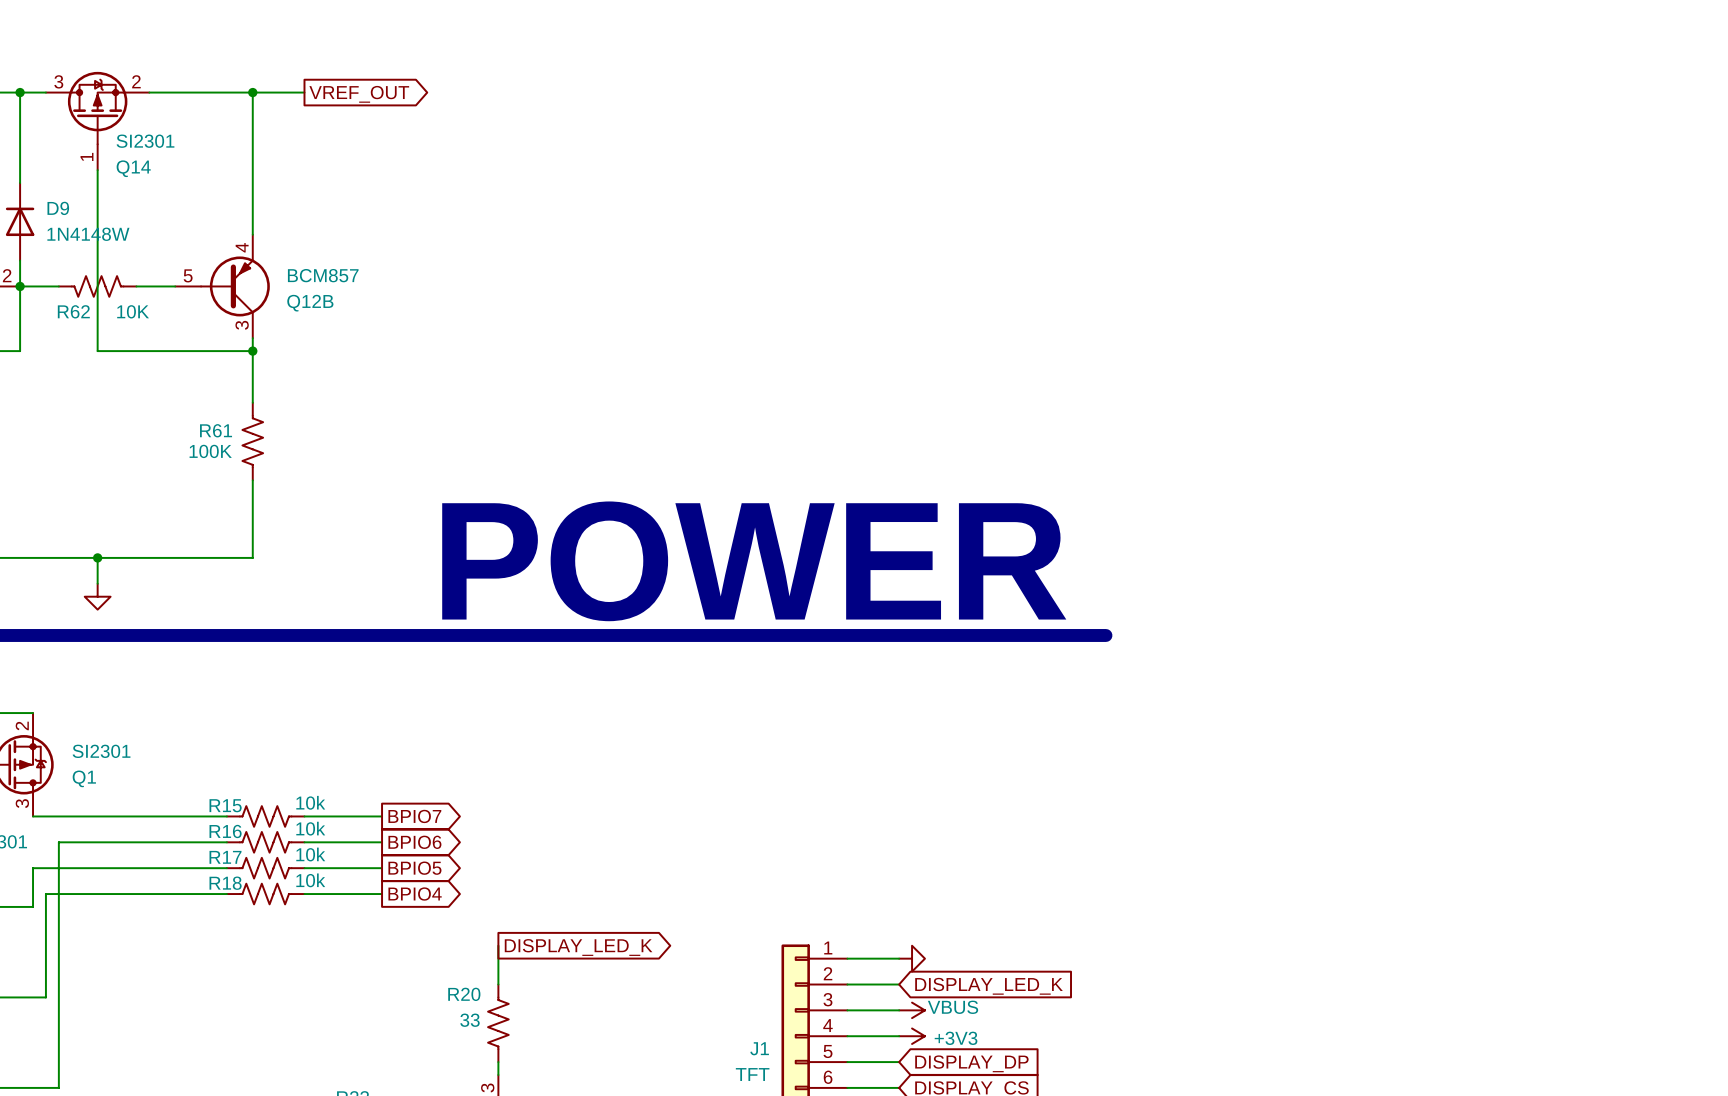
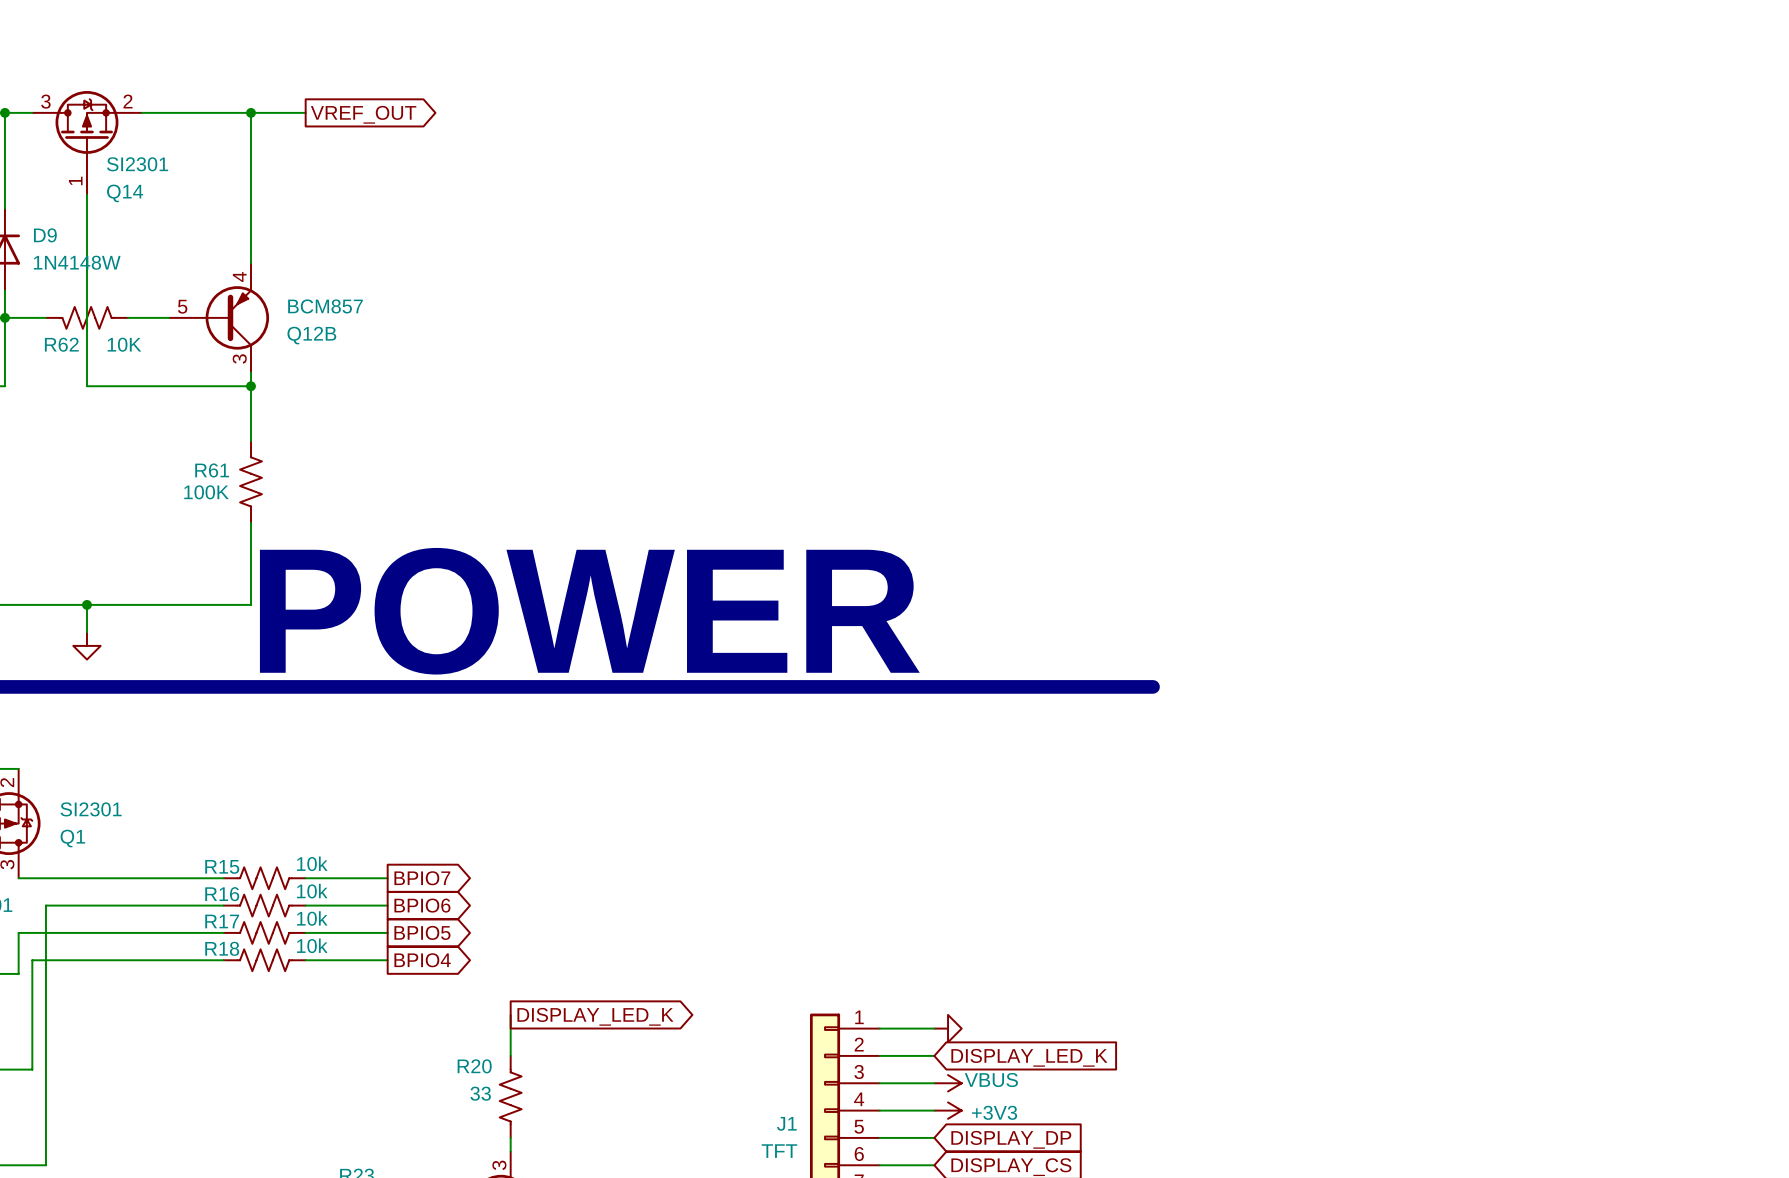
text position: POWER (754, 561) -> POWER (589, 611)

